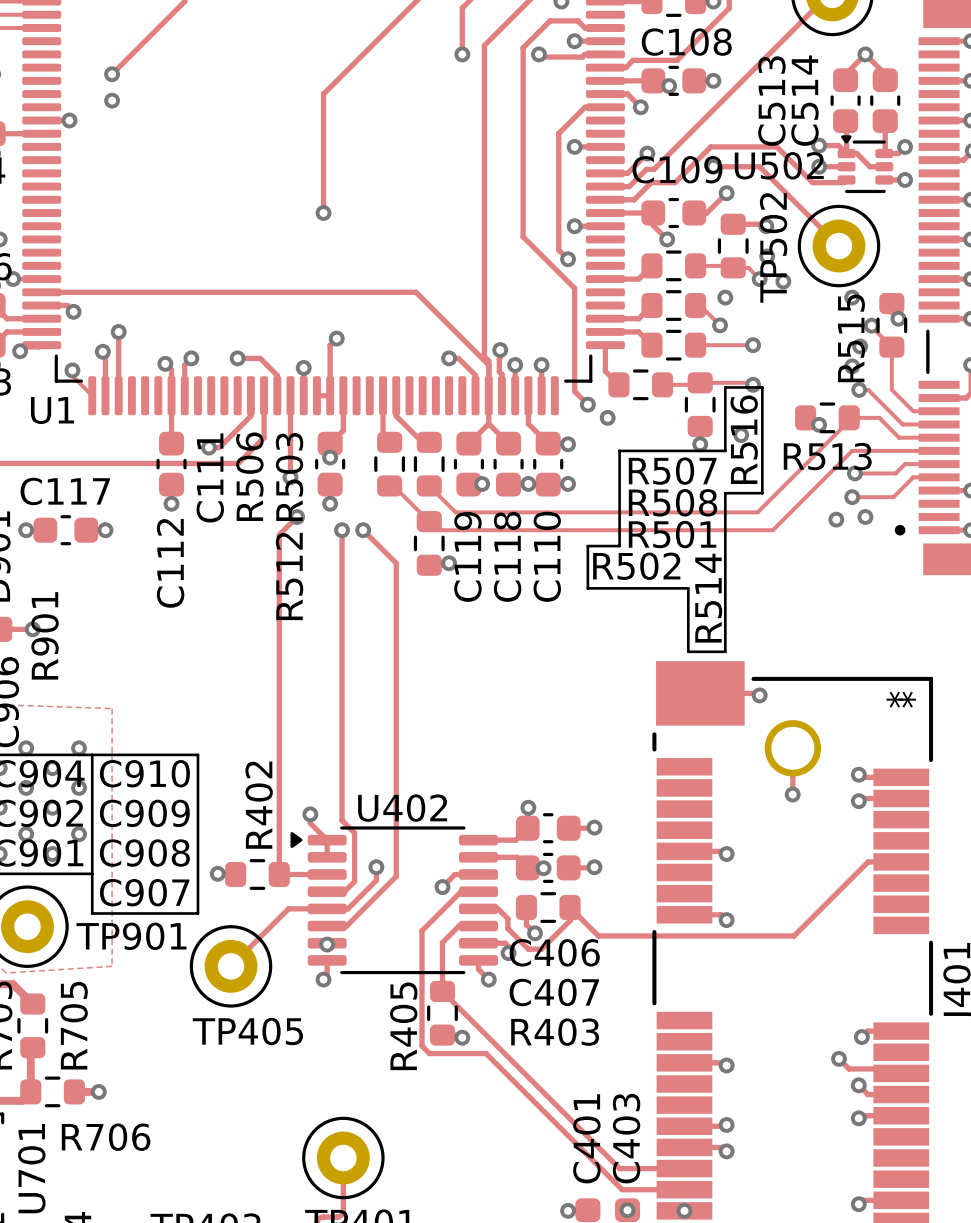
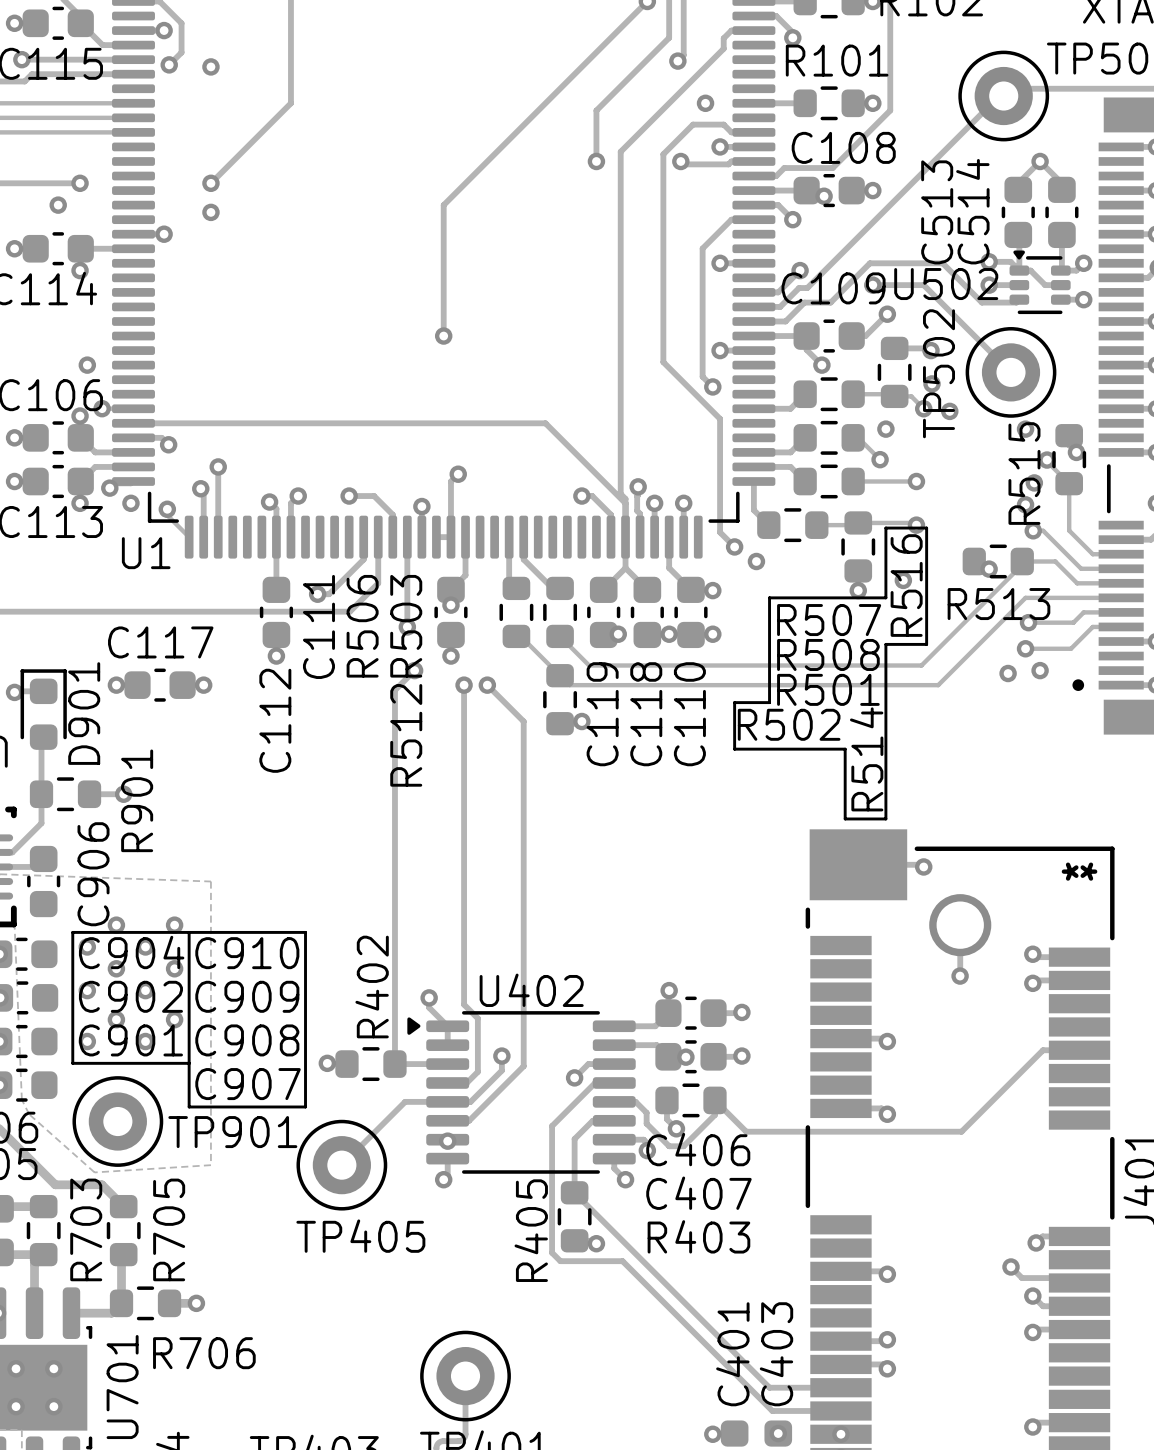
via: none -> (130, 503)

